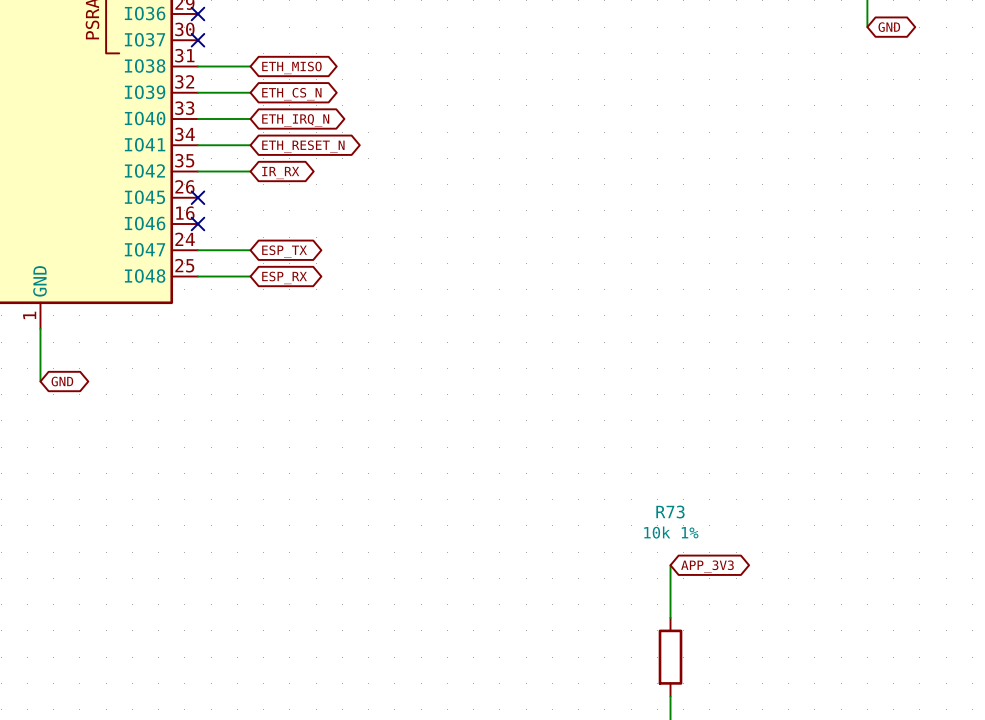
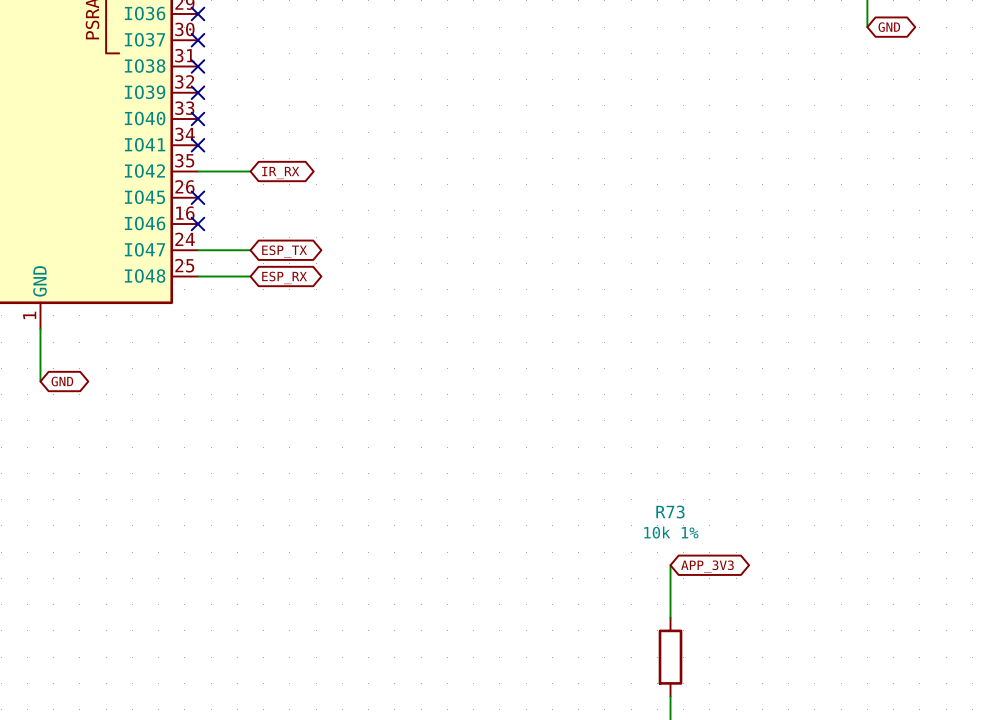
wire: (197, 66) (250, 66) -> none
no-connect mark: none -> (197, 66)
global label: ETH_MISO (291, 67) -> none
wire: (197, 92) (250, 92) -> none
no-connect mark: none -> (197, 92)
global label: ETH_CS_N (291, 94) -> none
wire: (197, 119) (250, 119) -> none
no-connect mark: none -> (197, 119)
global label: ETH_IRQ_N (295, 120) -> none
wire: (197, 145) (250, 145) -> none
no-connect mark: none -> (197, 145)
global label: ETH_RESET_N (303, 146) -> none

